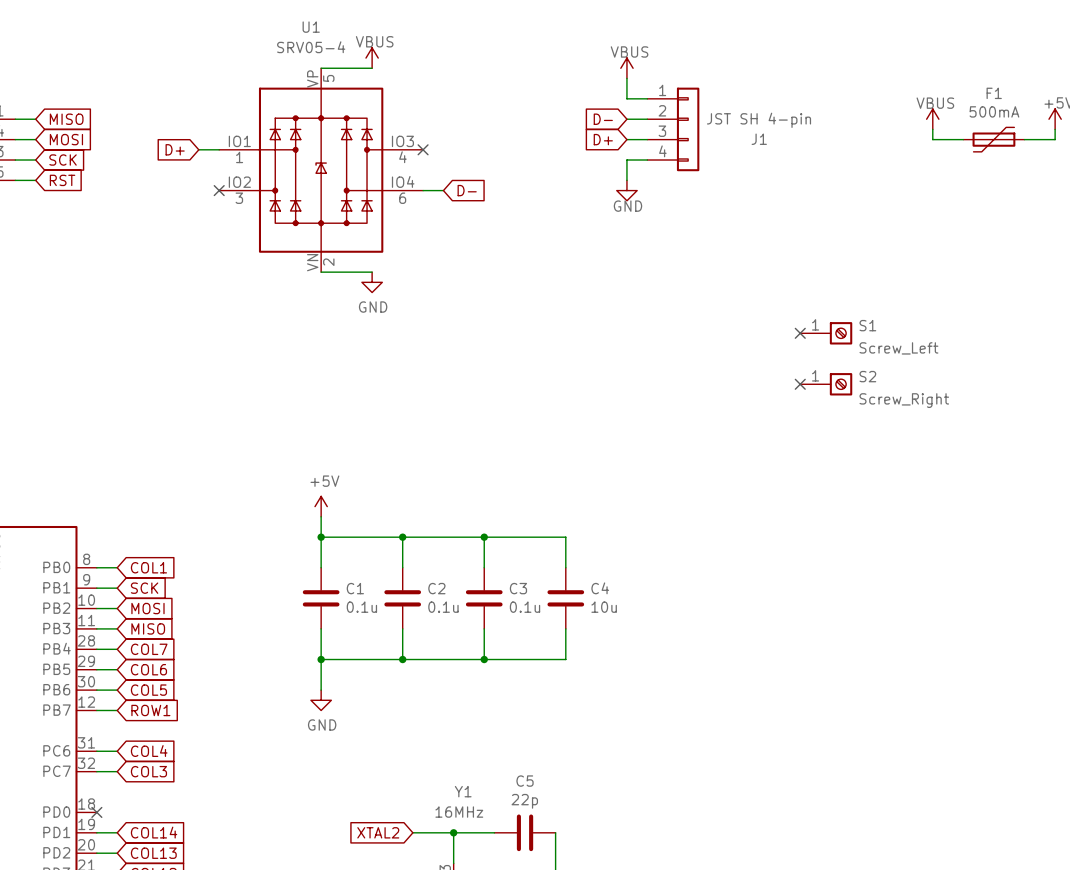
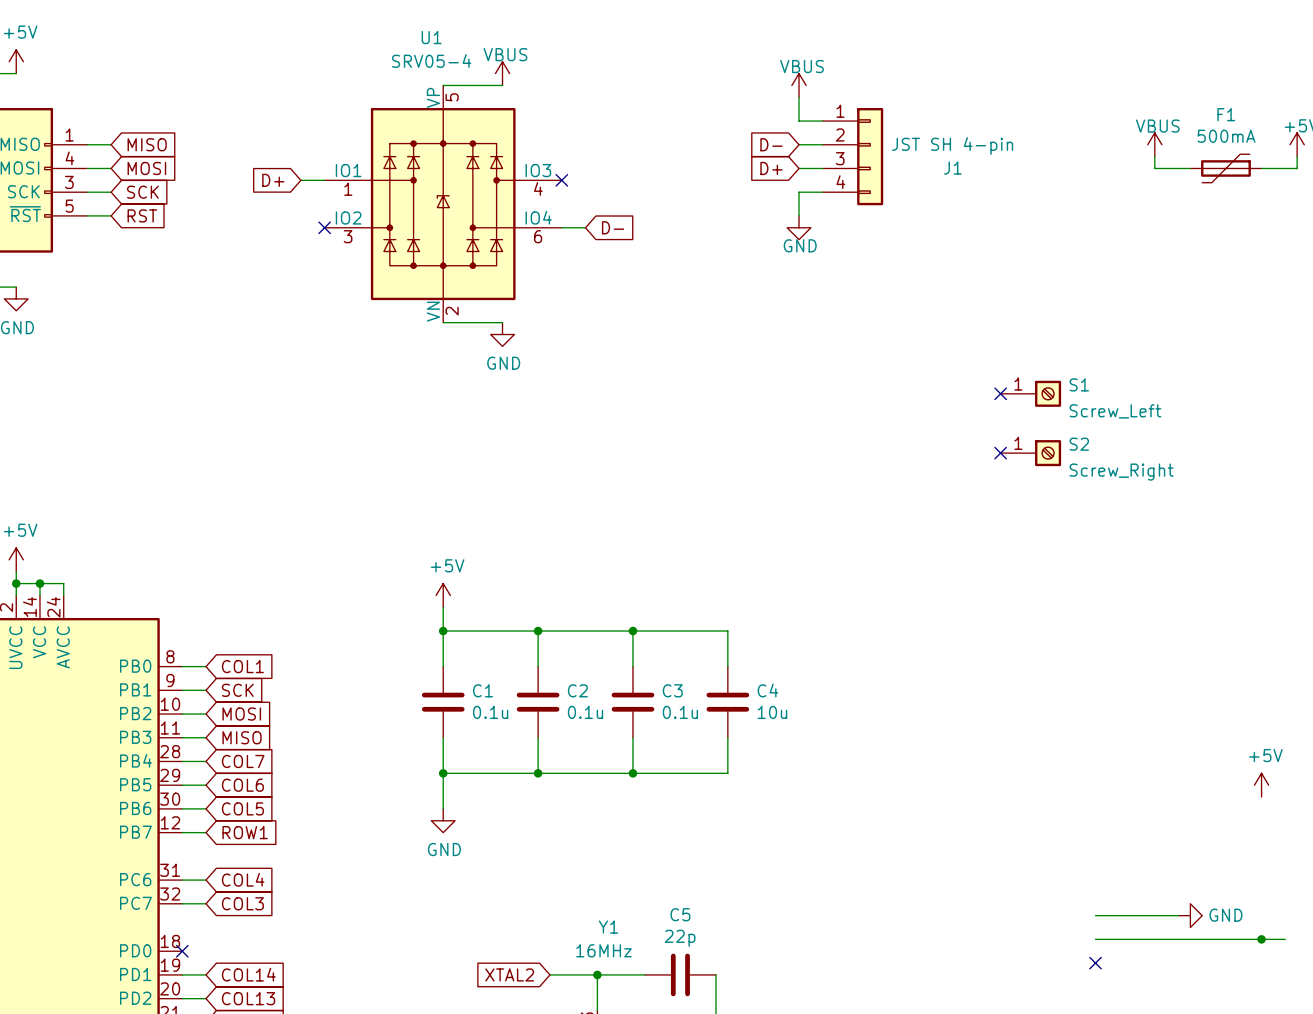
power symbol: none -> +5V (1261, 785)
wire: none -> (1095, 915) (1178, 915)
power symbol: none -> GND (1190, 915)
wire: none -> (1095, 939) (1285, 939)
junction: none -> (1261, 939)
no-connect mark: none -> (1095, 963)

